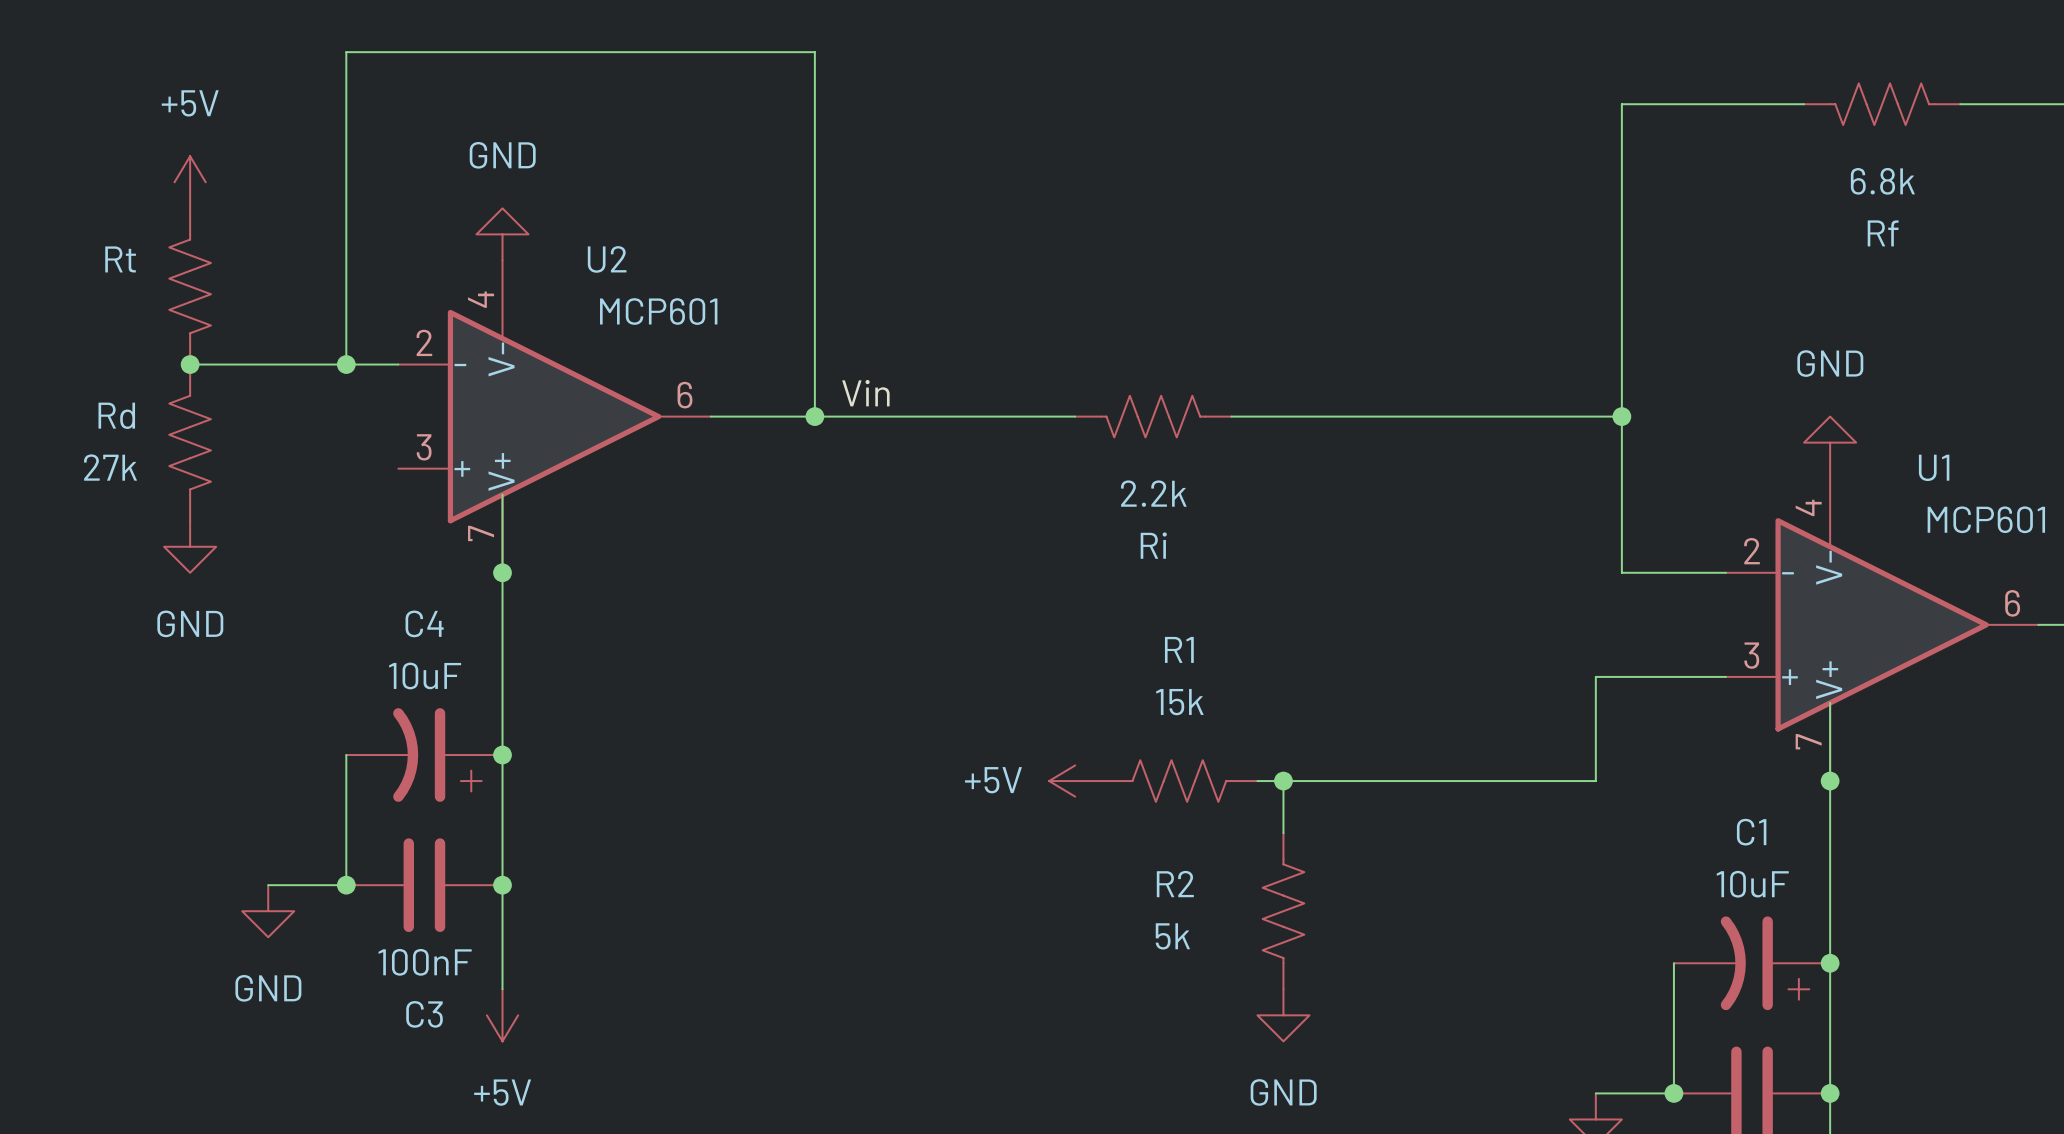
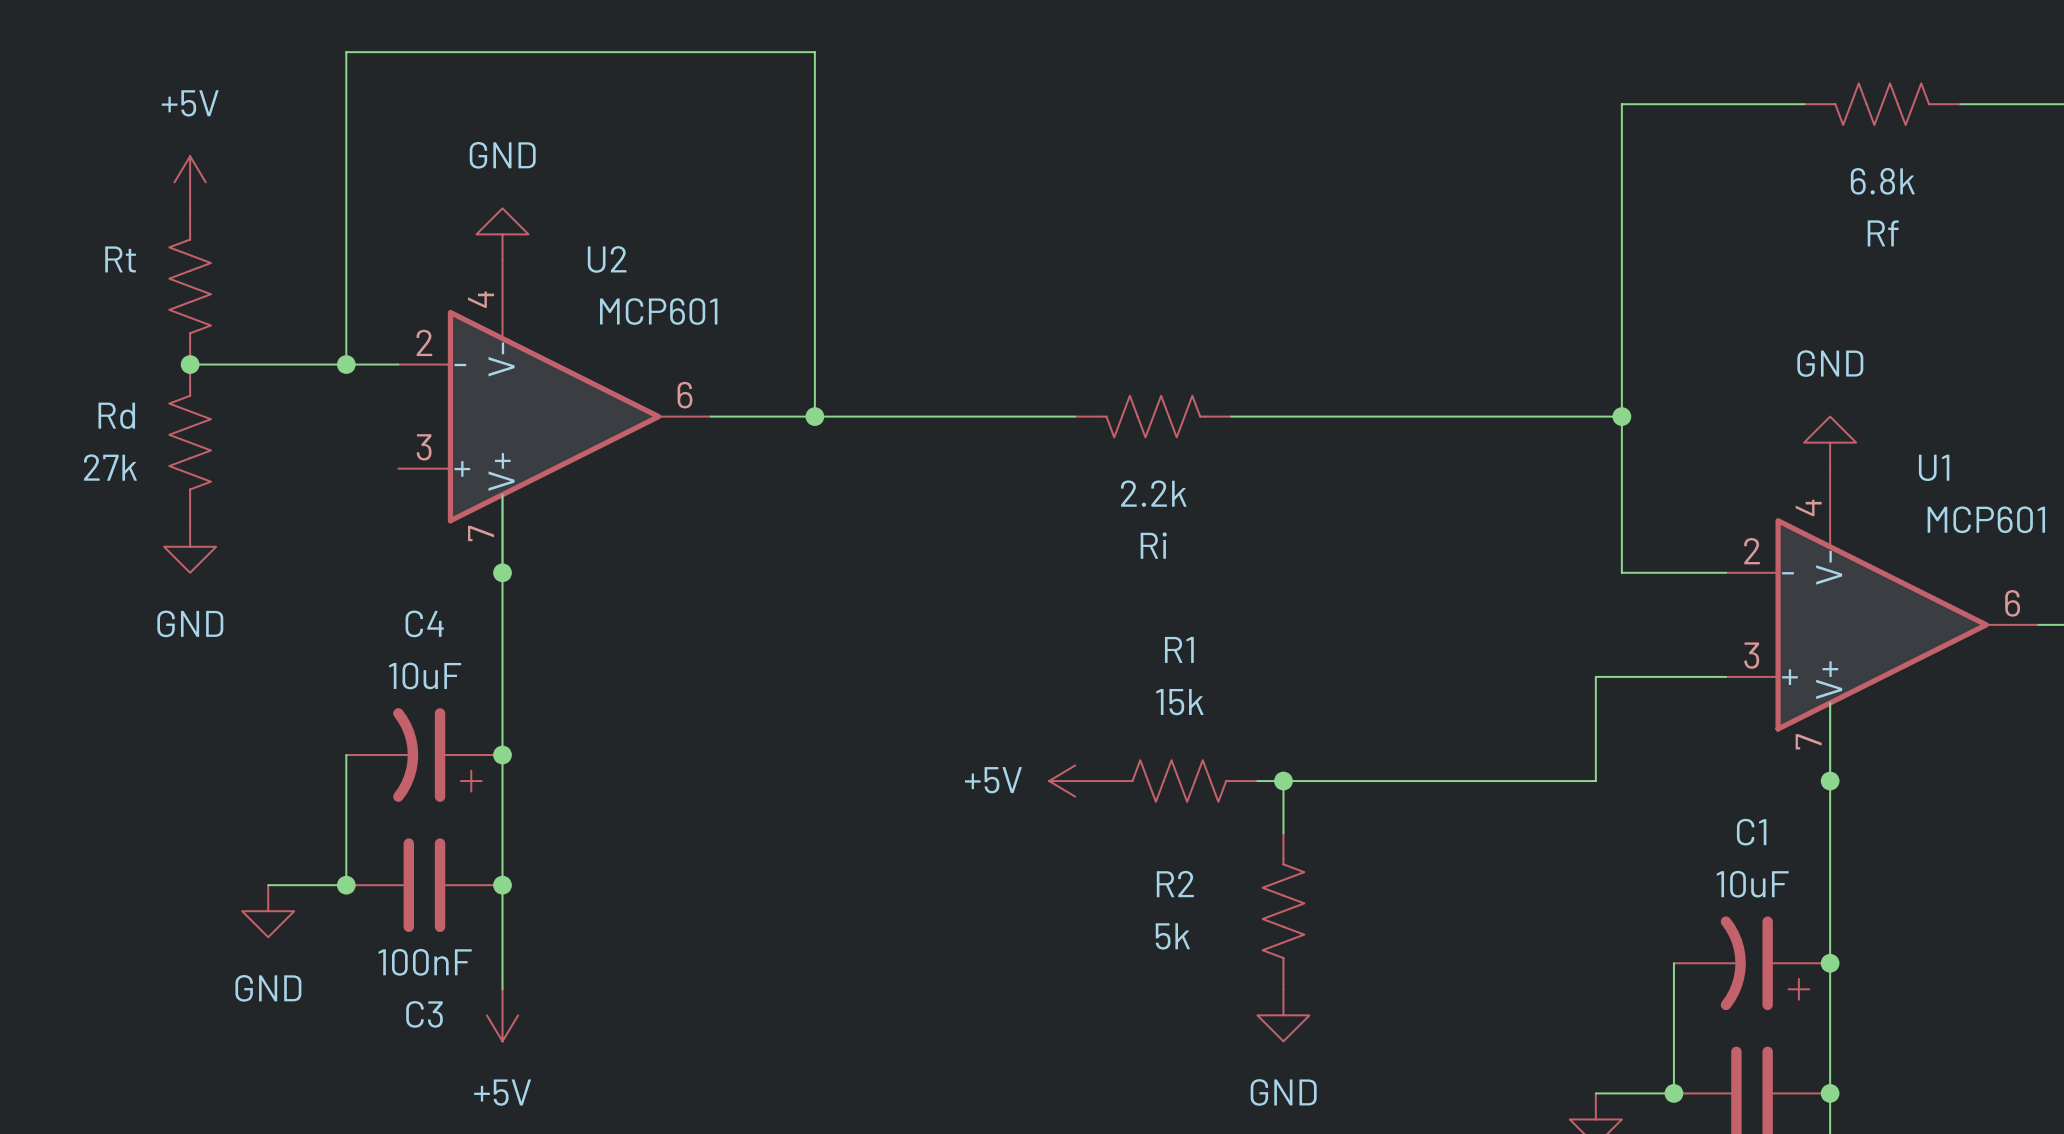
label: Vin (865, 393) -> none

